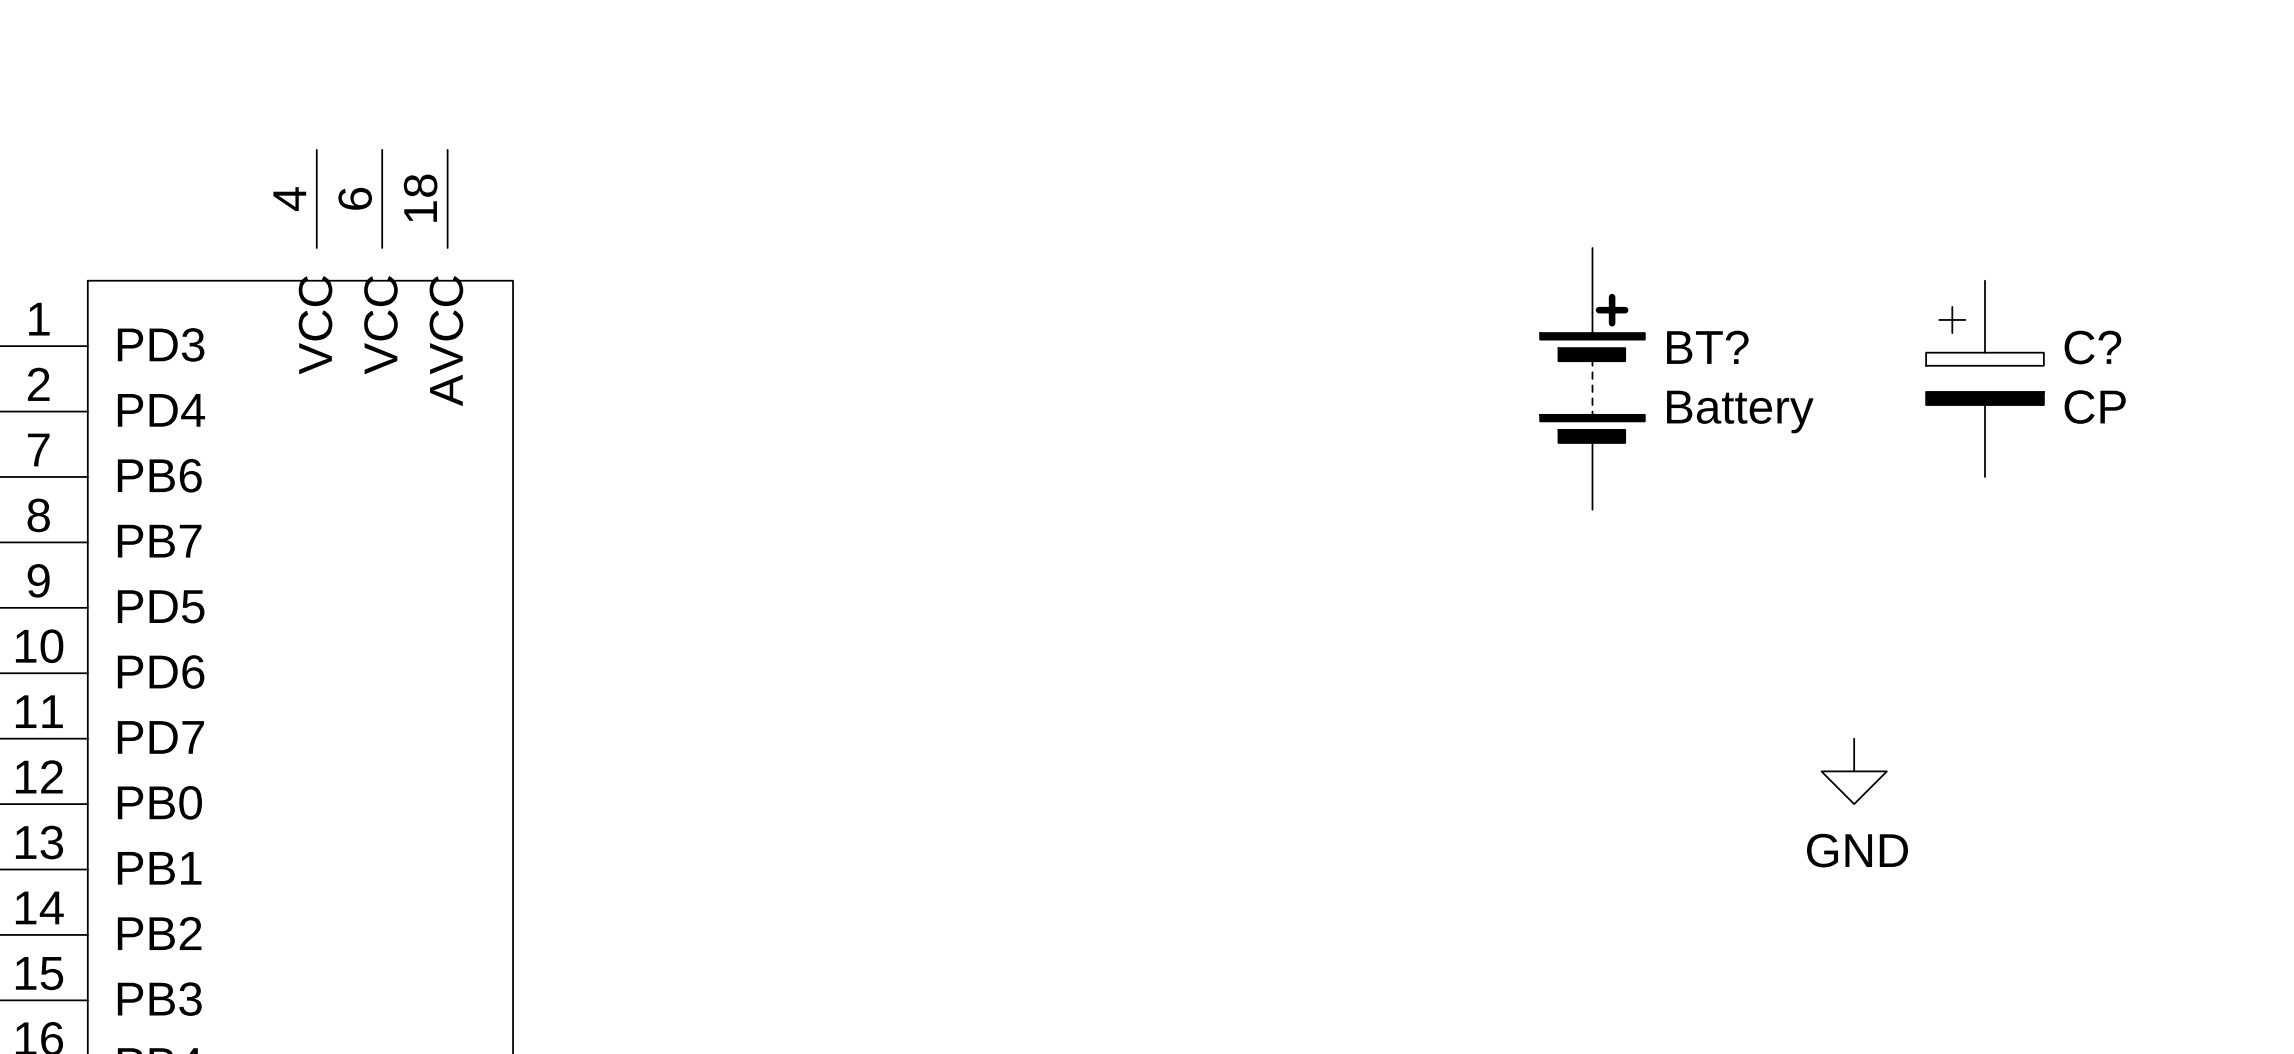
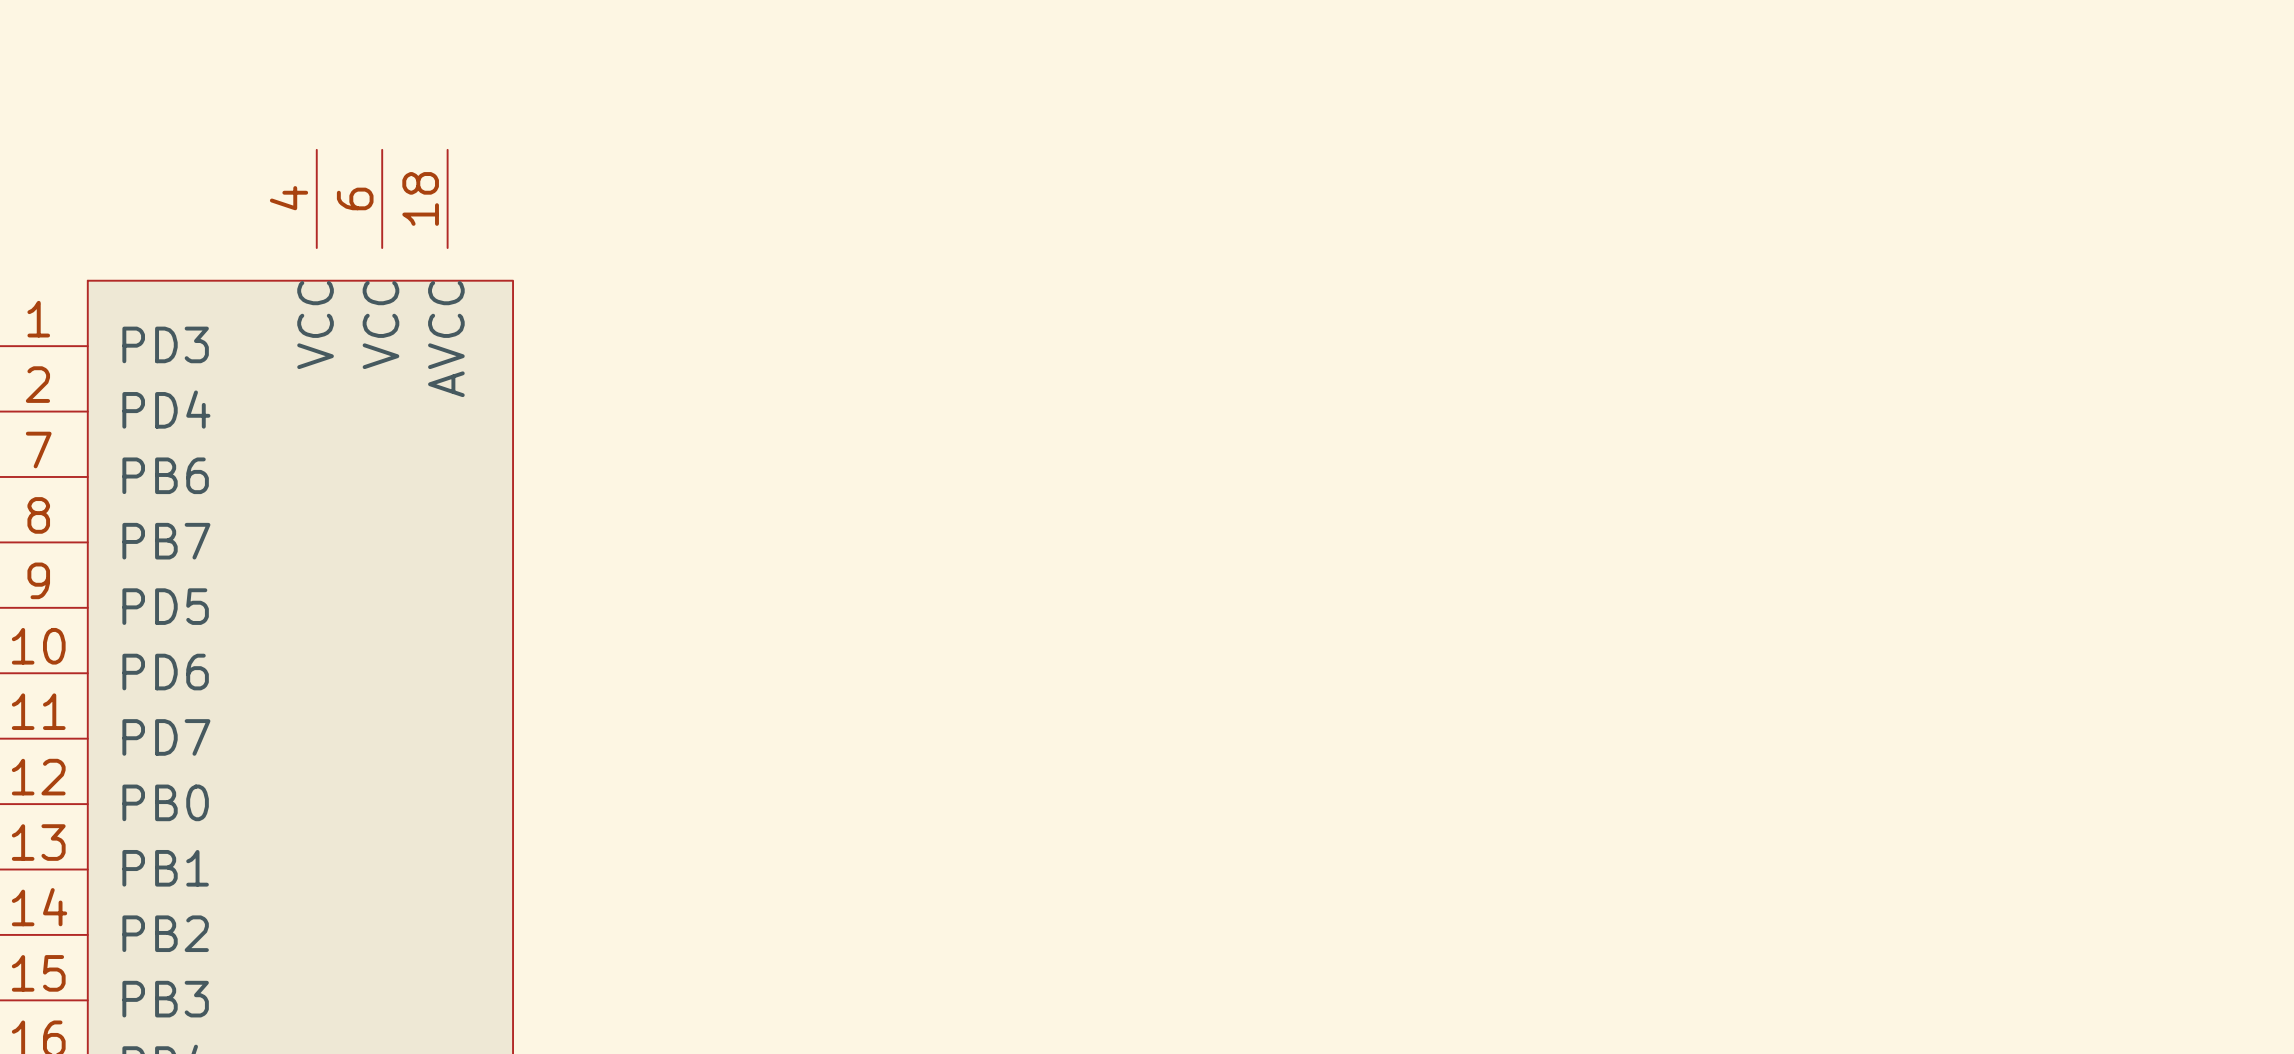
BT?: Battery (1592, 378) -> none
C?: CP (1985, 378) -> none
power symbol: GND (1854, 771) -> none

